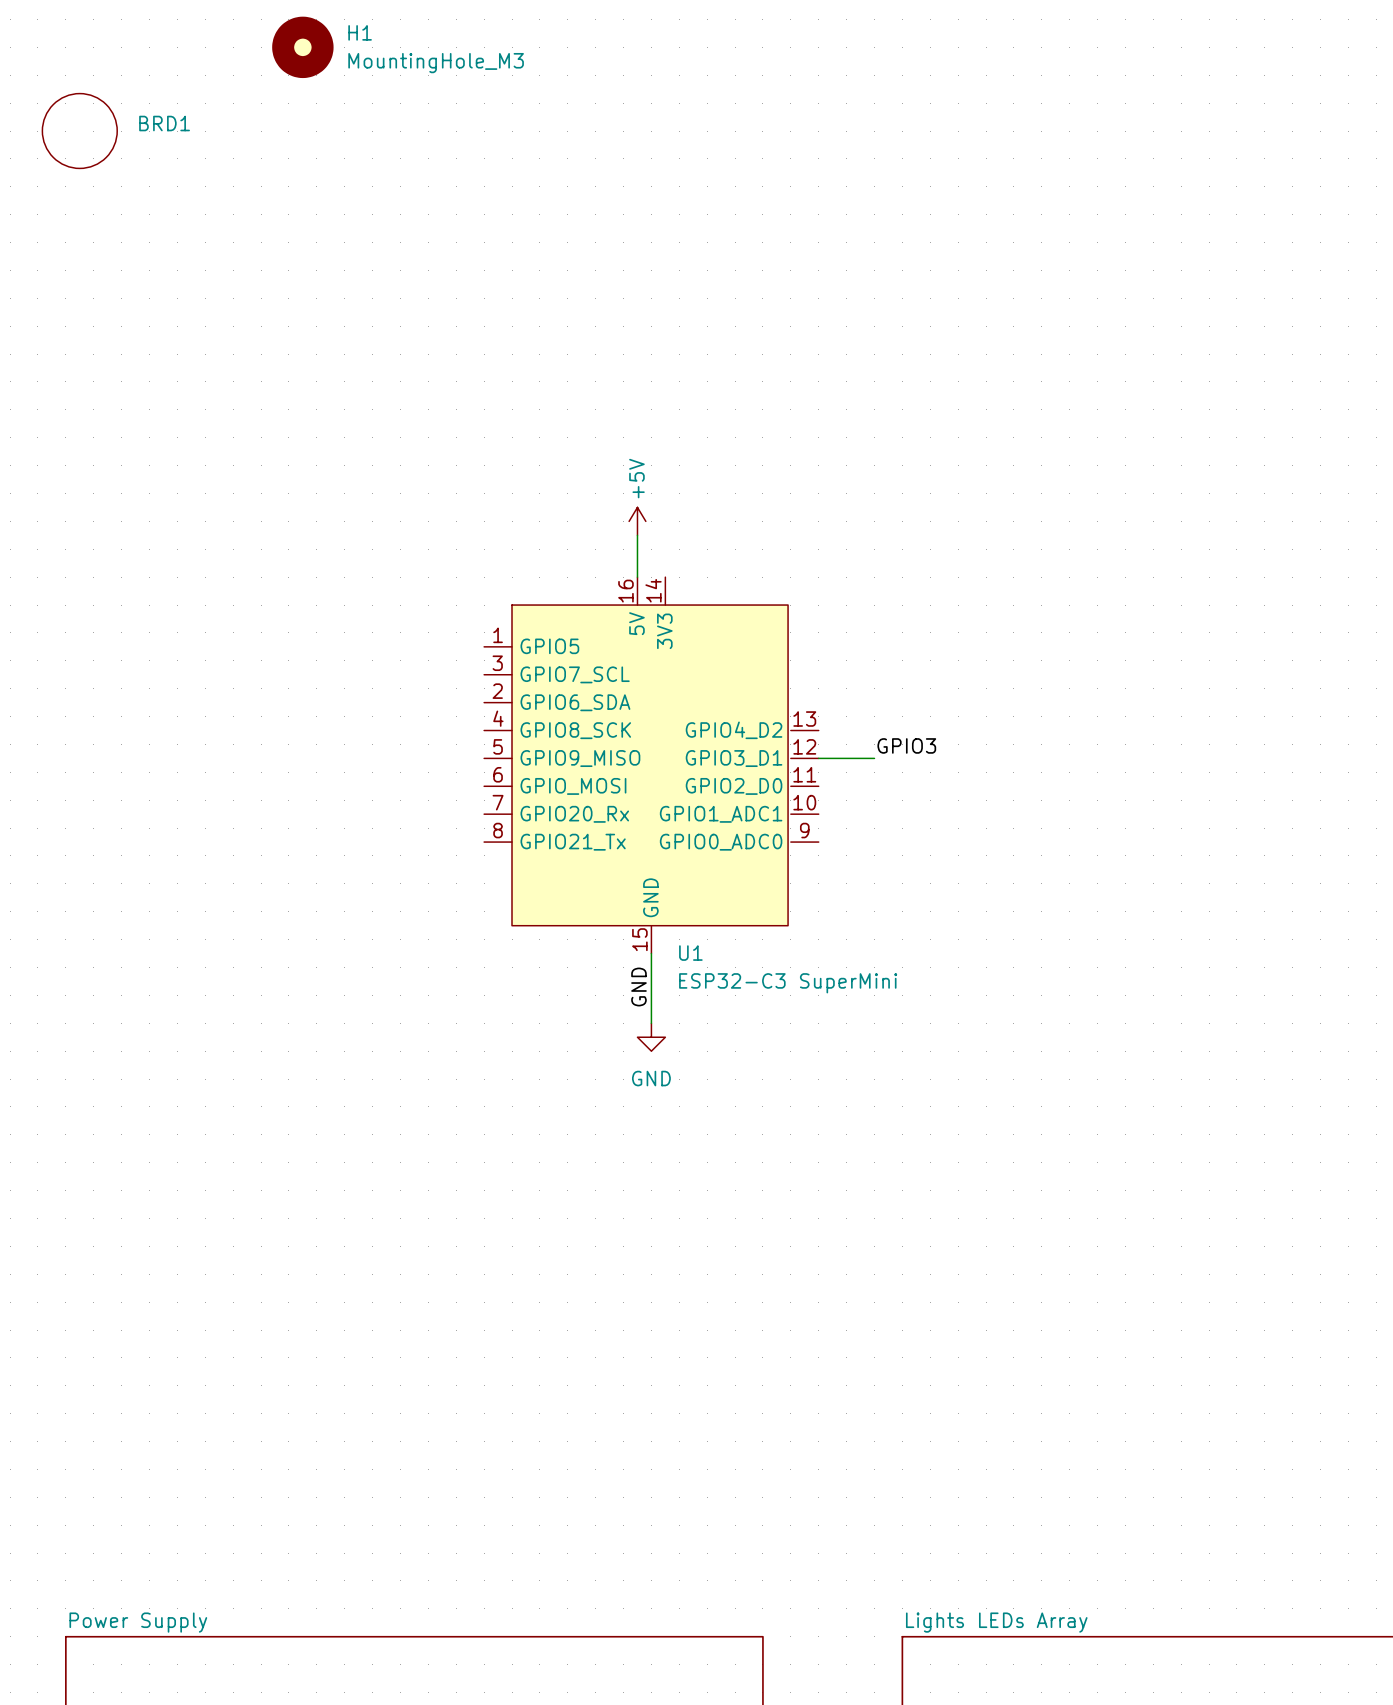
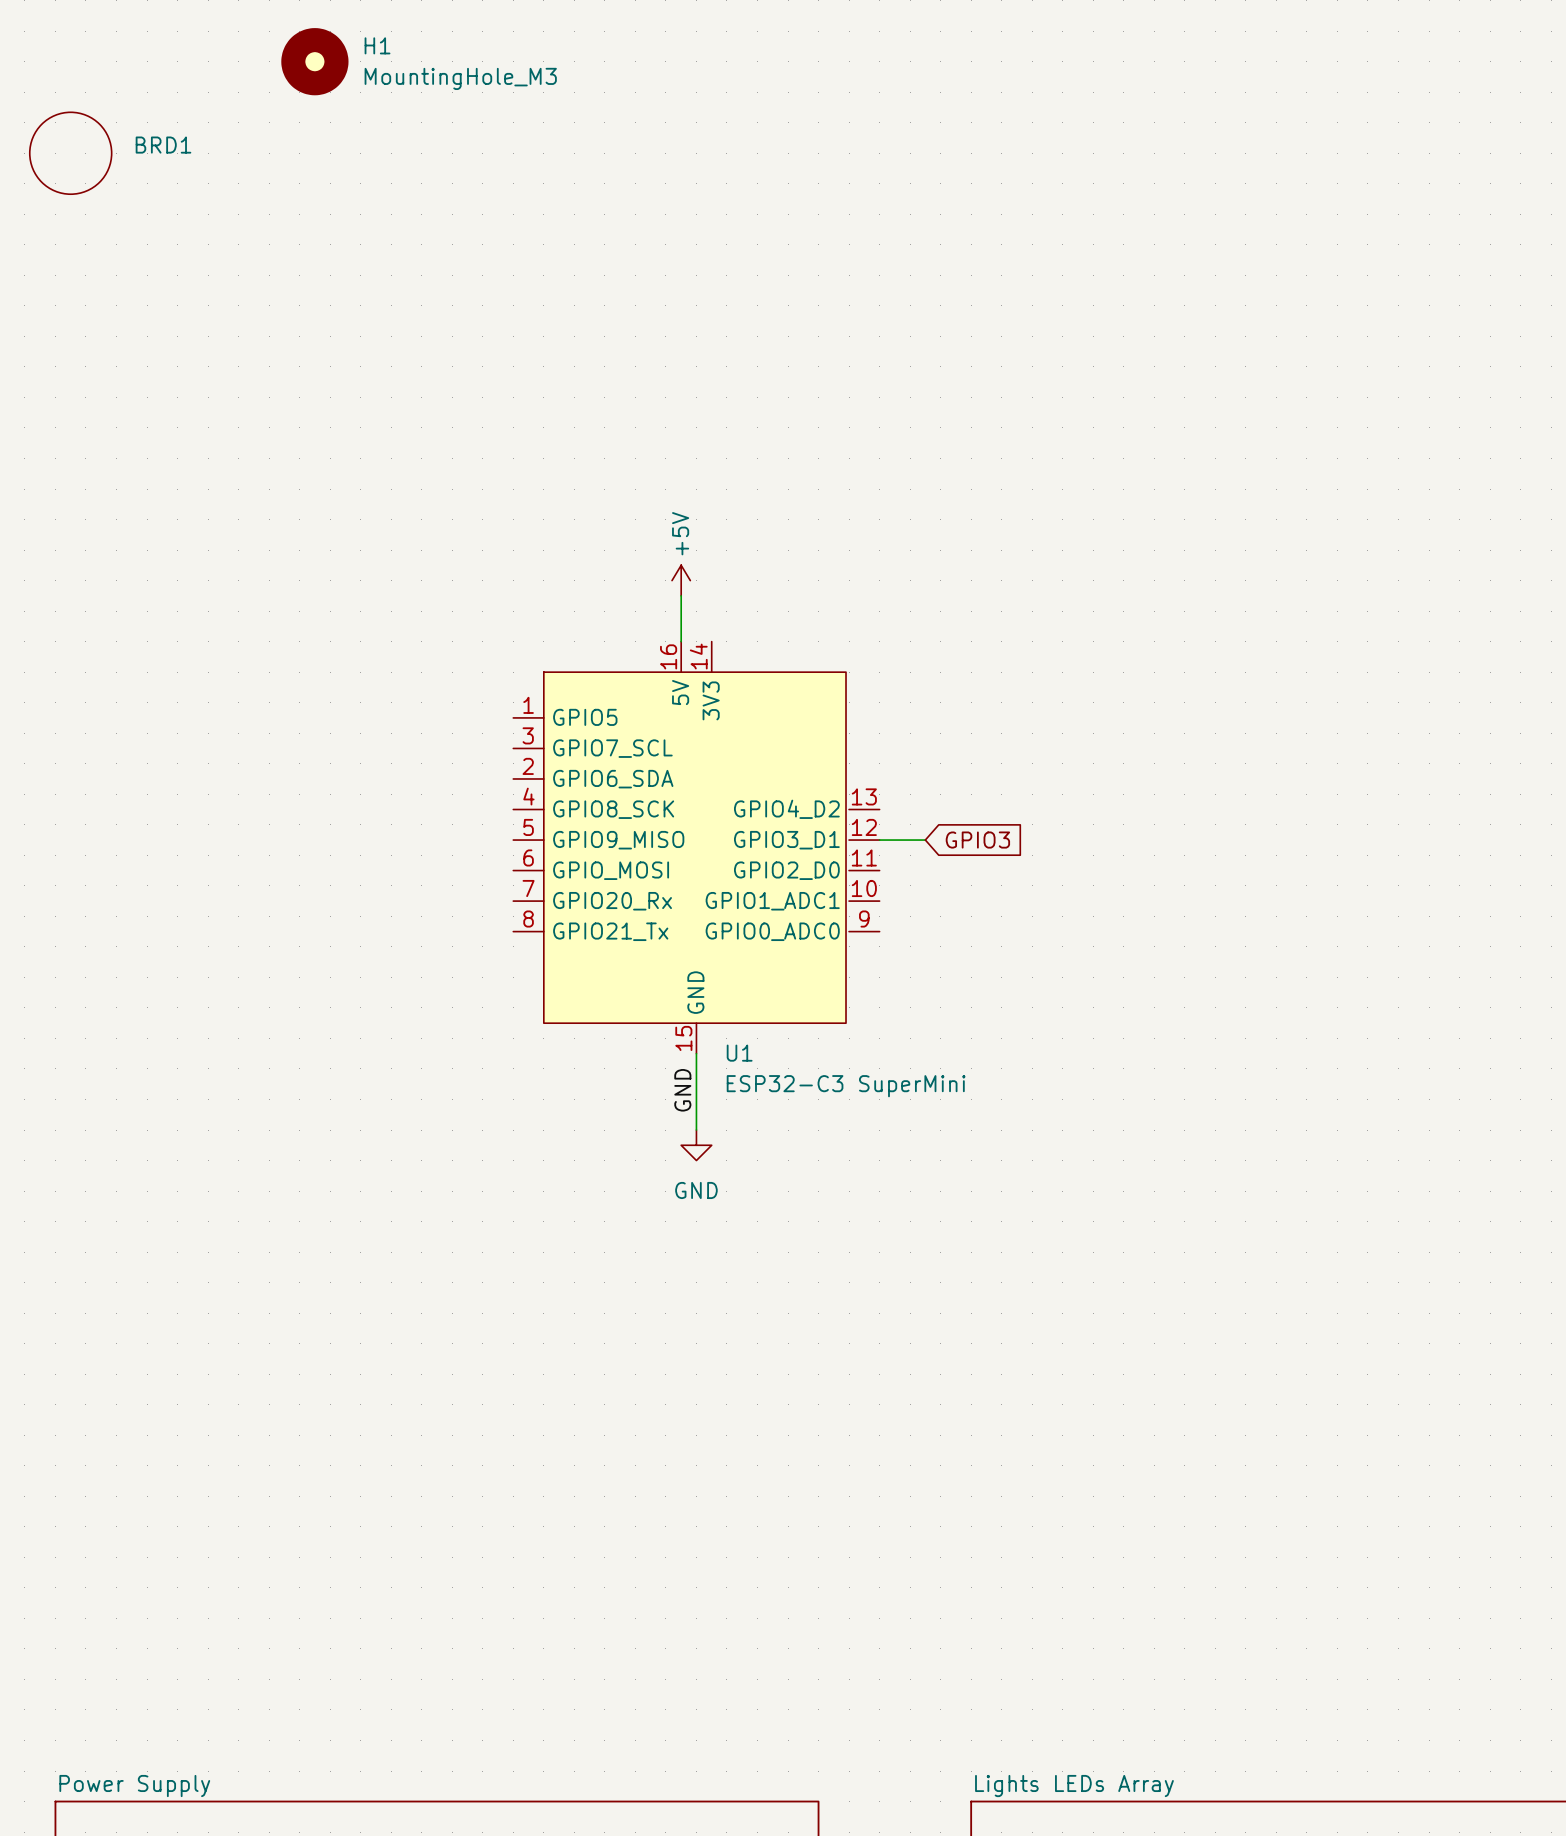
label: GPIO3 (906, 745) -> none
wire: (860, 758) (874, 758) -> none
global label: none -> GPIO3 (977, 840)

